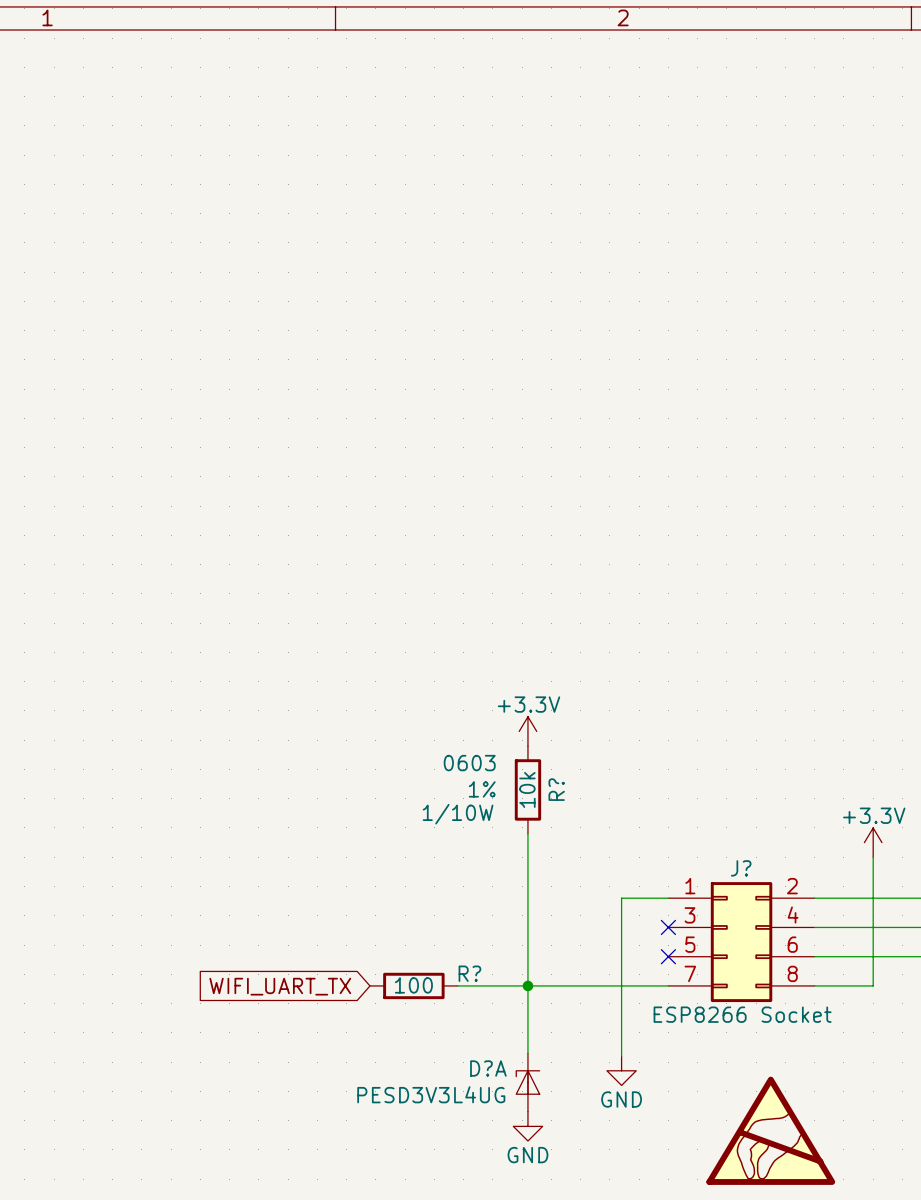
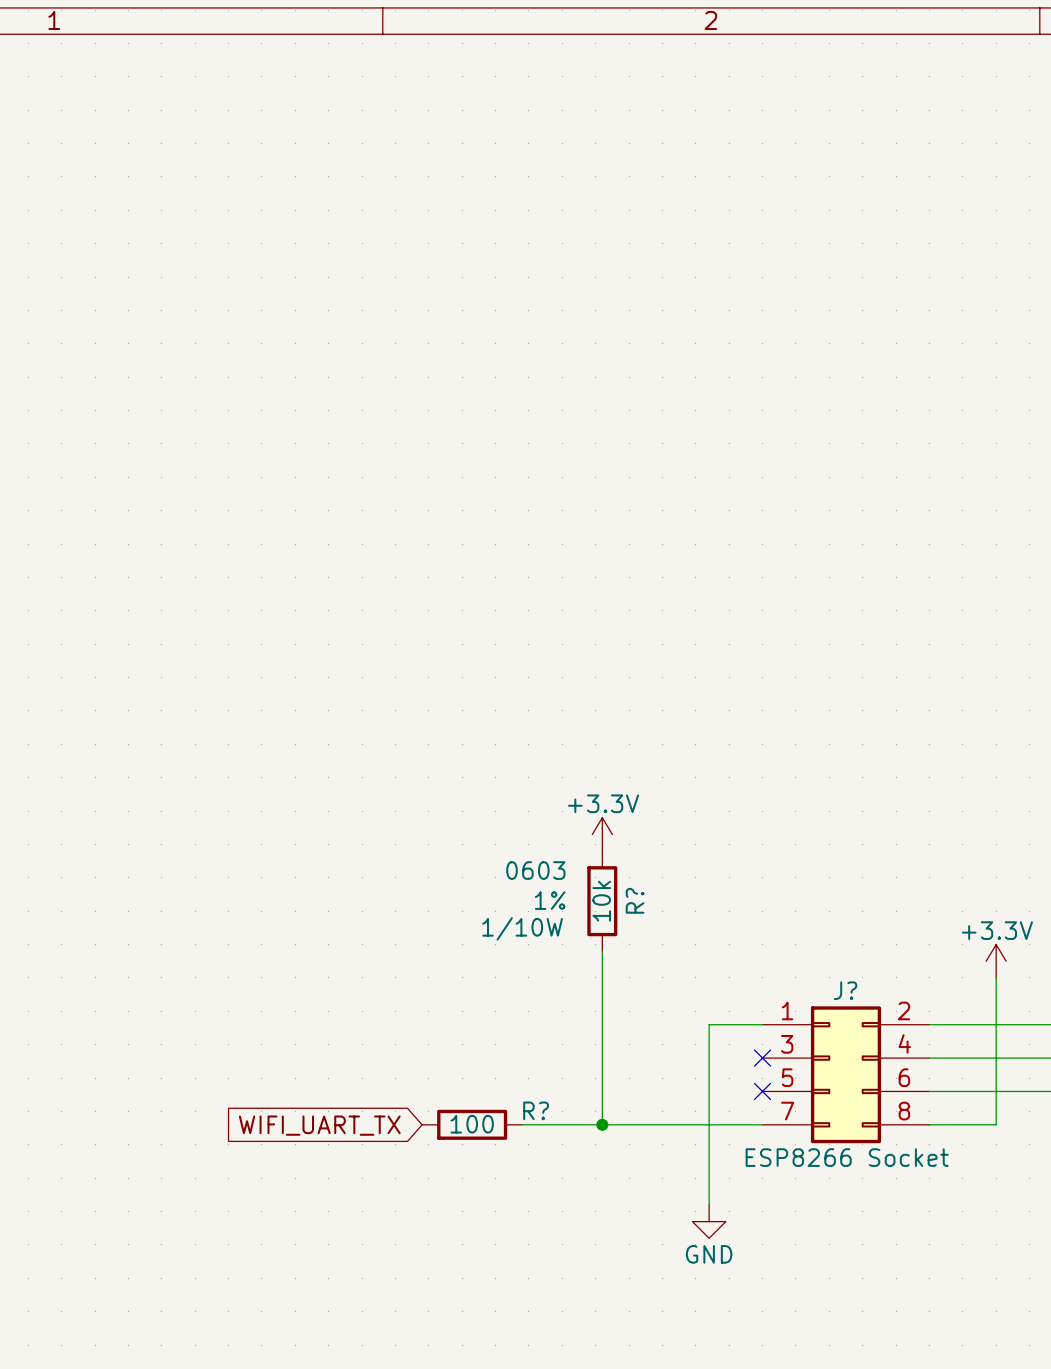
wire: (527, 985) (527, 1053) -> none
D?A: PESD3V3L4UG (527, 1082) -> none
power symbol: GND (527, 1126) -> none
power symbol: (770, 1130) -> none

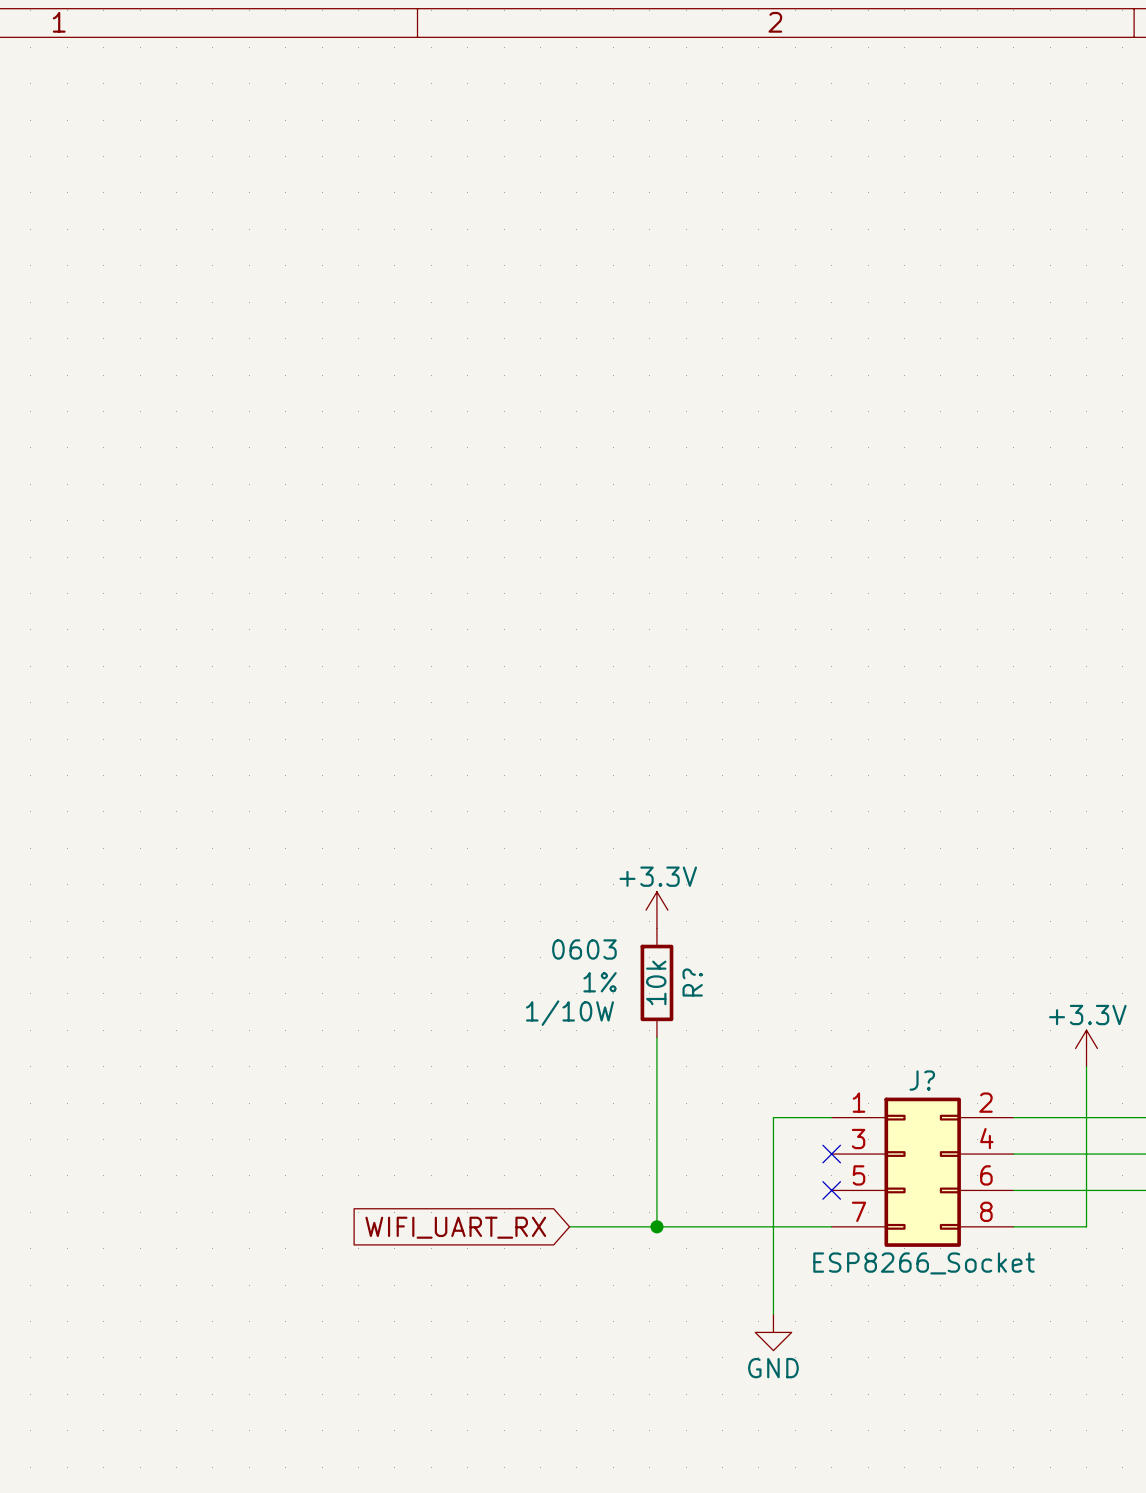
R?: 100 (472, 1124) -> none
global label: WIFI_UART_TX (319, 1125) -> WIFI_UART_RX (455, 1227)
J? value: ESP8266 Socket (847, 1157) -> ESP8266_Socket (924, 1263)

